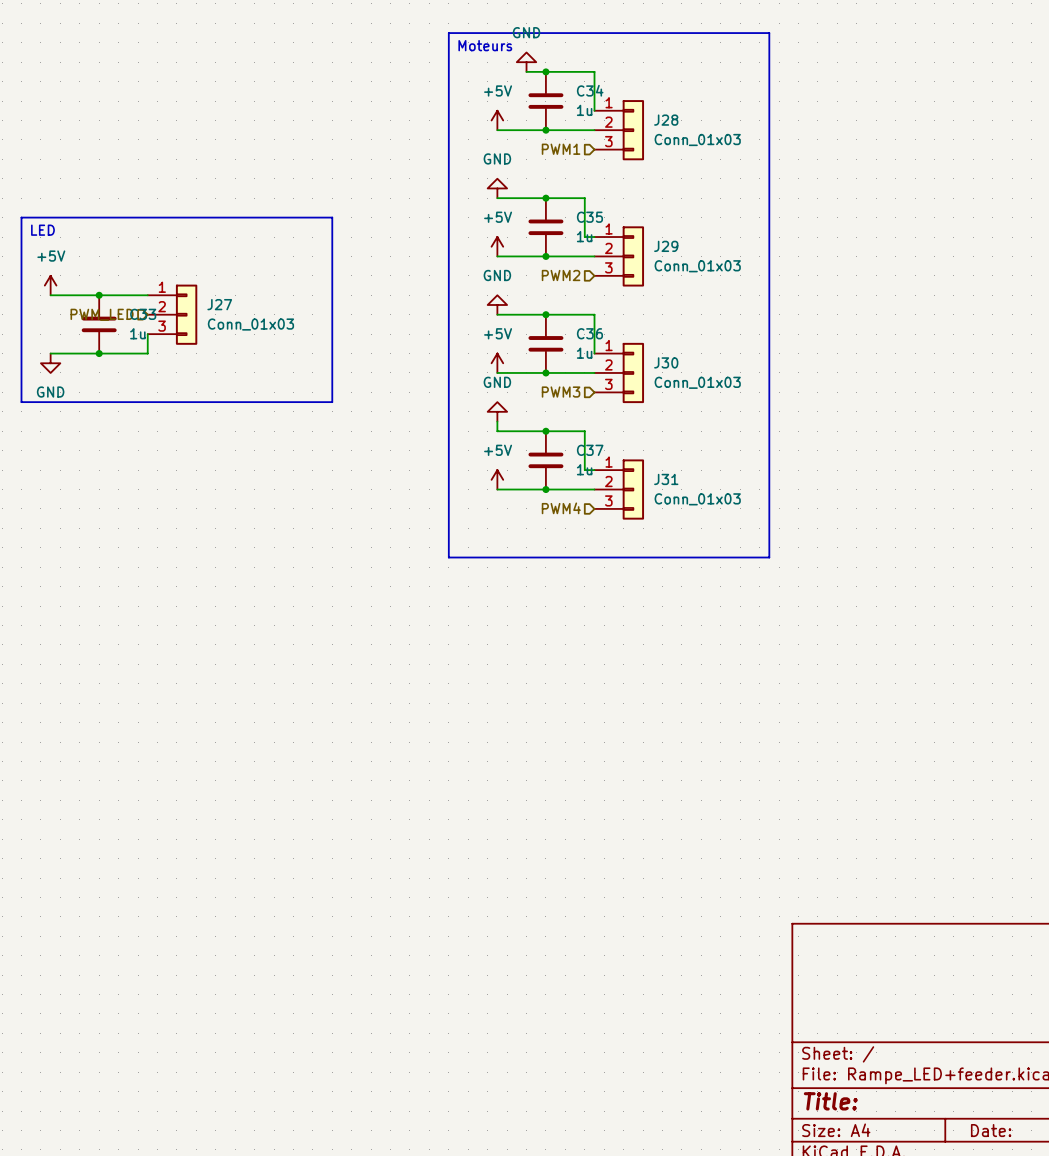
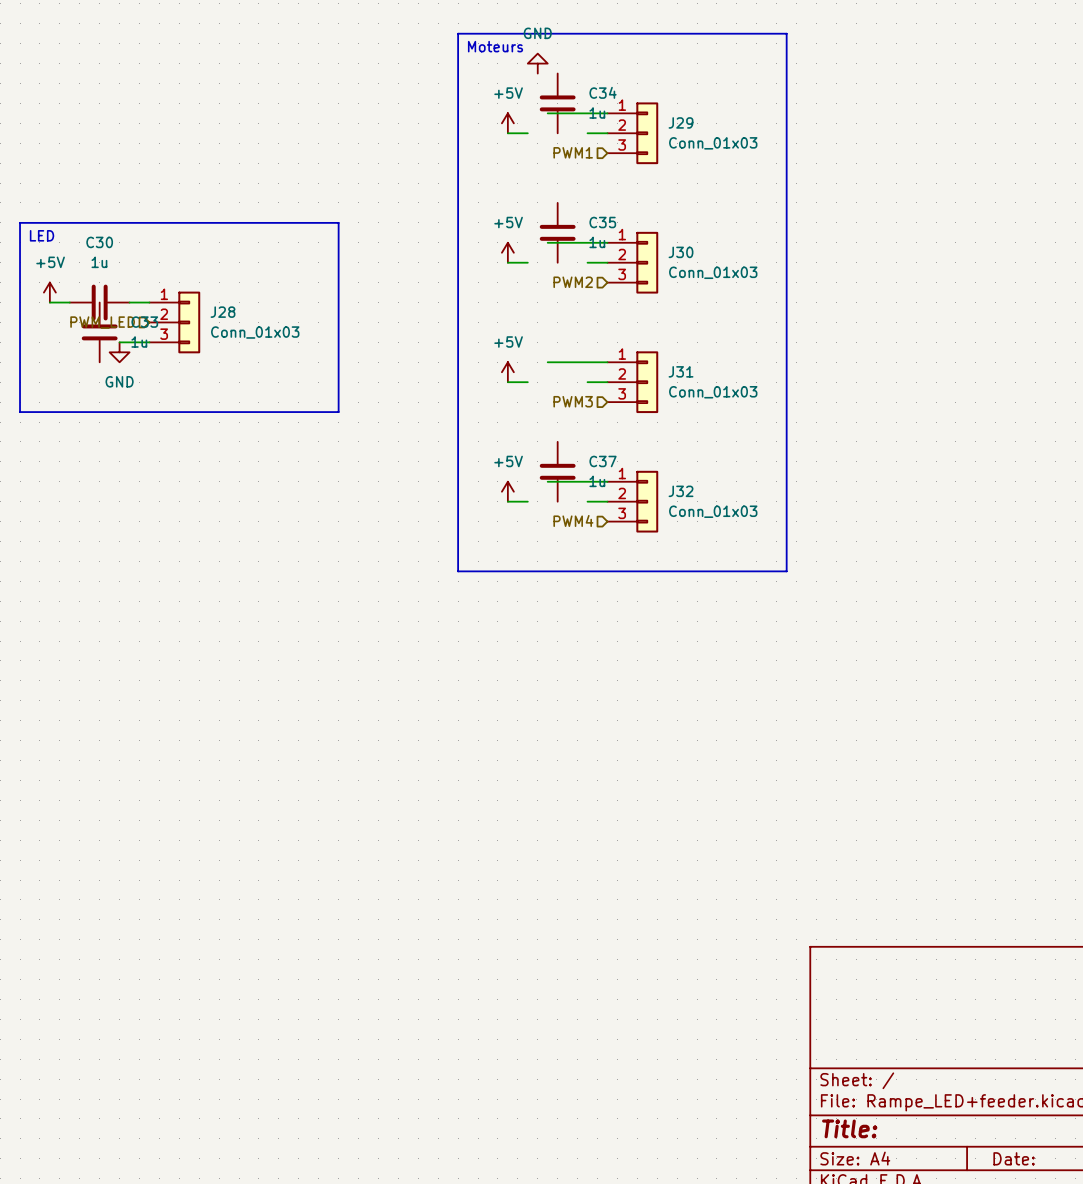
wire: (526, 71) (594, 71) (594, 110) -> (547, 113) (607, 113)
junction: (545, 71) -> none
J28 name: J28 (666, 120) -> J29 (681, 122)
wire: (516, 130) (575, 130) -> none
junction: (545, 130) -> none
power symbol: GND (497, 188) -> none
wire: (497, 198) (584, 198) (584, 237) -> (547, 242) (597, 242)
junction: (545, 198) -> none
J29 name: J29 (666, 246) -> J30 (681, 252)
wire: (516, 256) (575, 256) -> none
junction: (545, 256) -> none
junction: (99, 295) -> none
C30: none -> 1u (99, 302)
J27 name: J27 (219, 304) -> J28 (223, 312)
power symbol: GND (497, 304) -> none
wire: (497, 314) (594, 314) (594, 353) -> (547, 362) (607, 362)
junction: (545, 314) -> none
wire: (147, 334) (147, 353) (50, 353) -> (149, 342) (119, 342)
C36: 1u (545, 343) -> none
junction: (99, 353) -> none
J30 name: J30 (666, 362) -> J31 (681, 371)
power symbol position: GND (50, 363) -> GND (119, 352)
wire: (516, 372) (575, 372) -> none
junction: (545, 372) -> none
power symbol: GND (497, 411) -> none
wire: (497, 421) (497, 431) (584, 431) (584, 470) -> (547, 481) (597, 481)
junction: (545, 431) -> none
J31 name: J31 (666, 479) -> J32 (681, 491)
wire: (516, 489) (575, 489) -> none
junction: (545, 489) -> none

